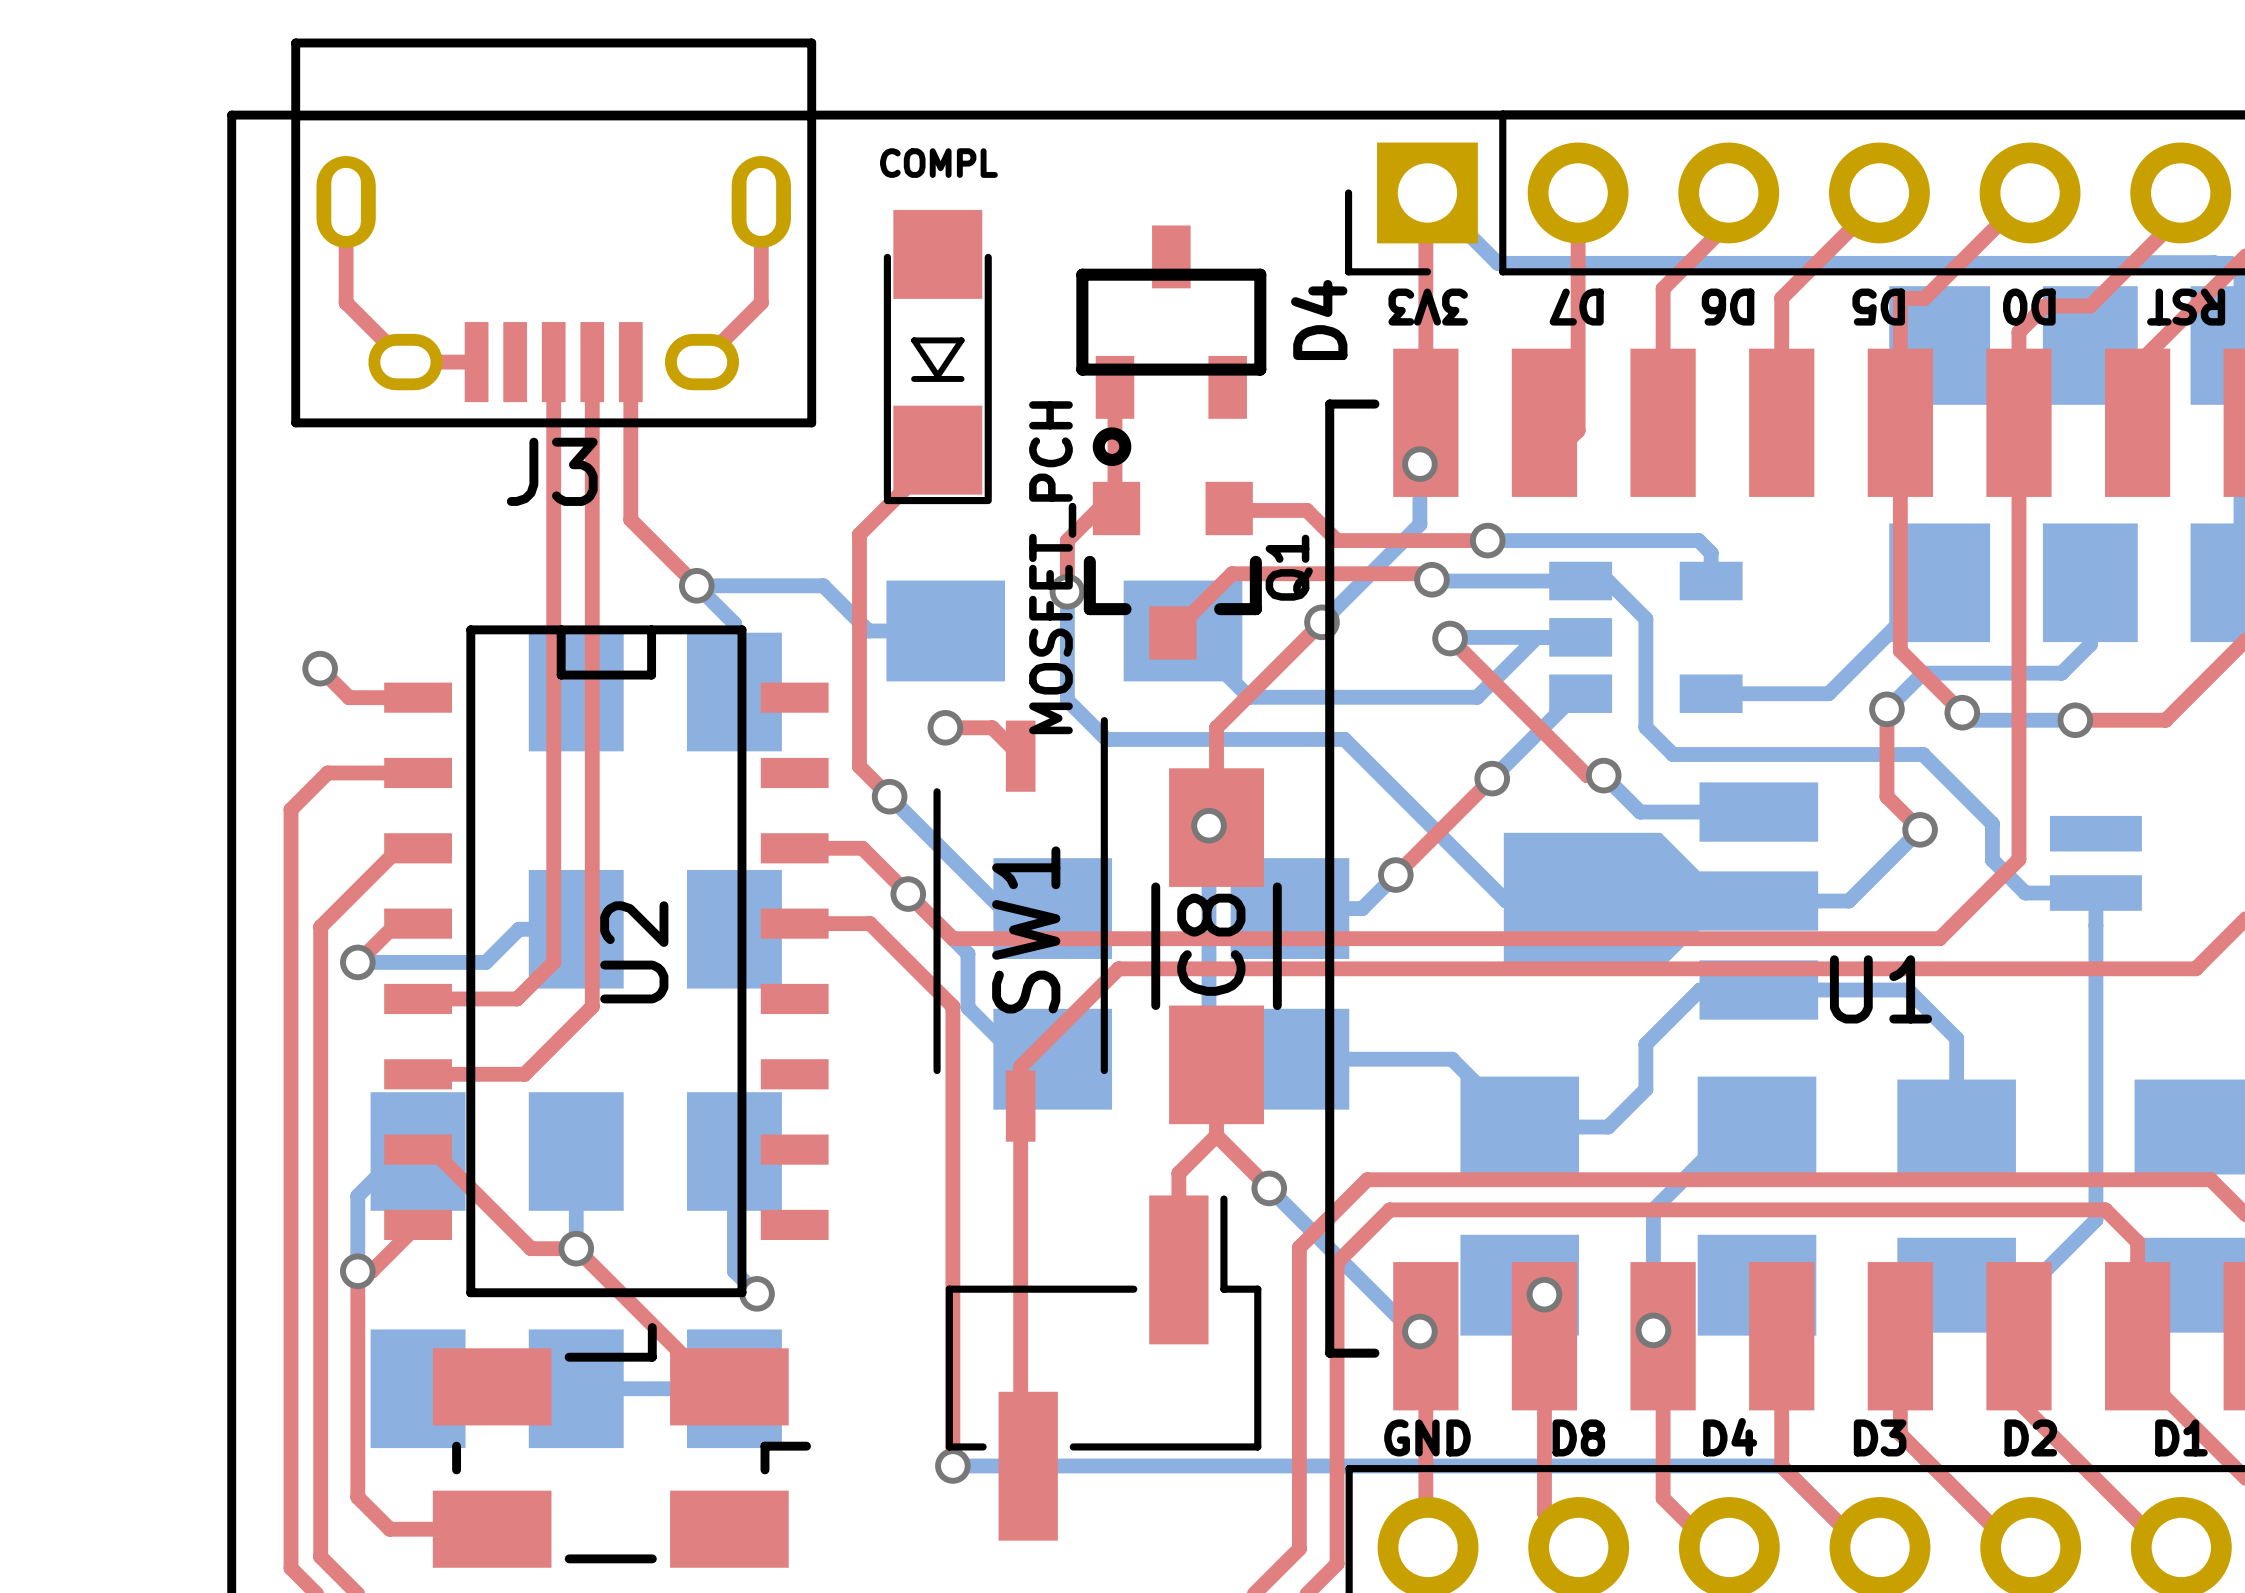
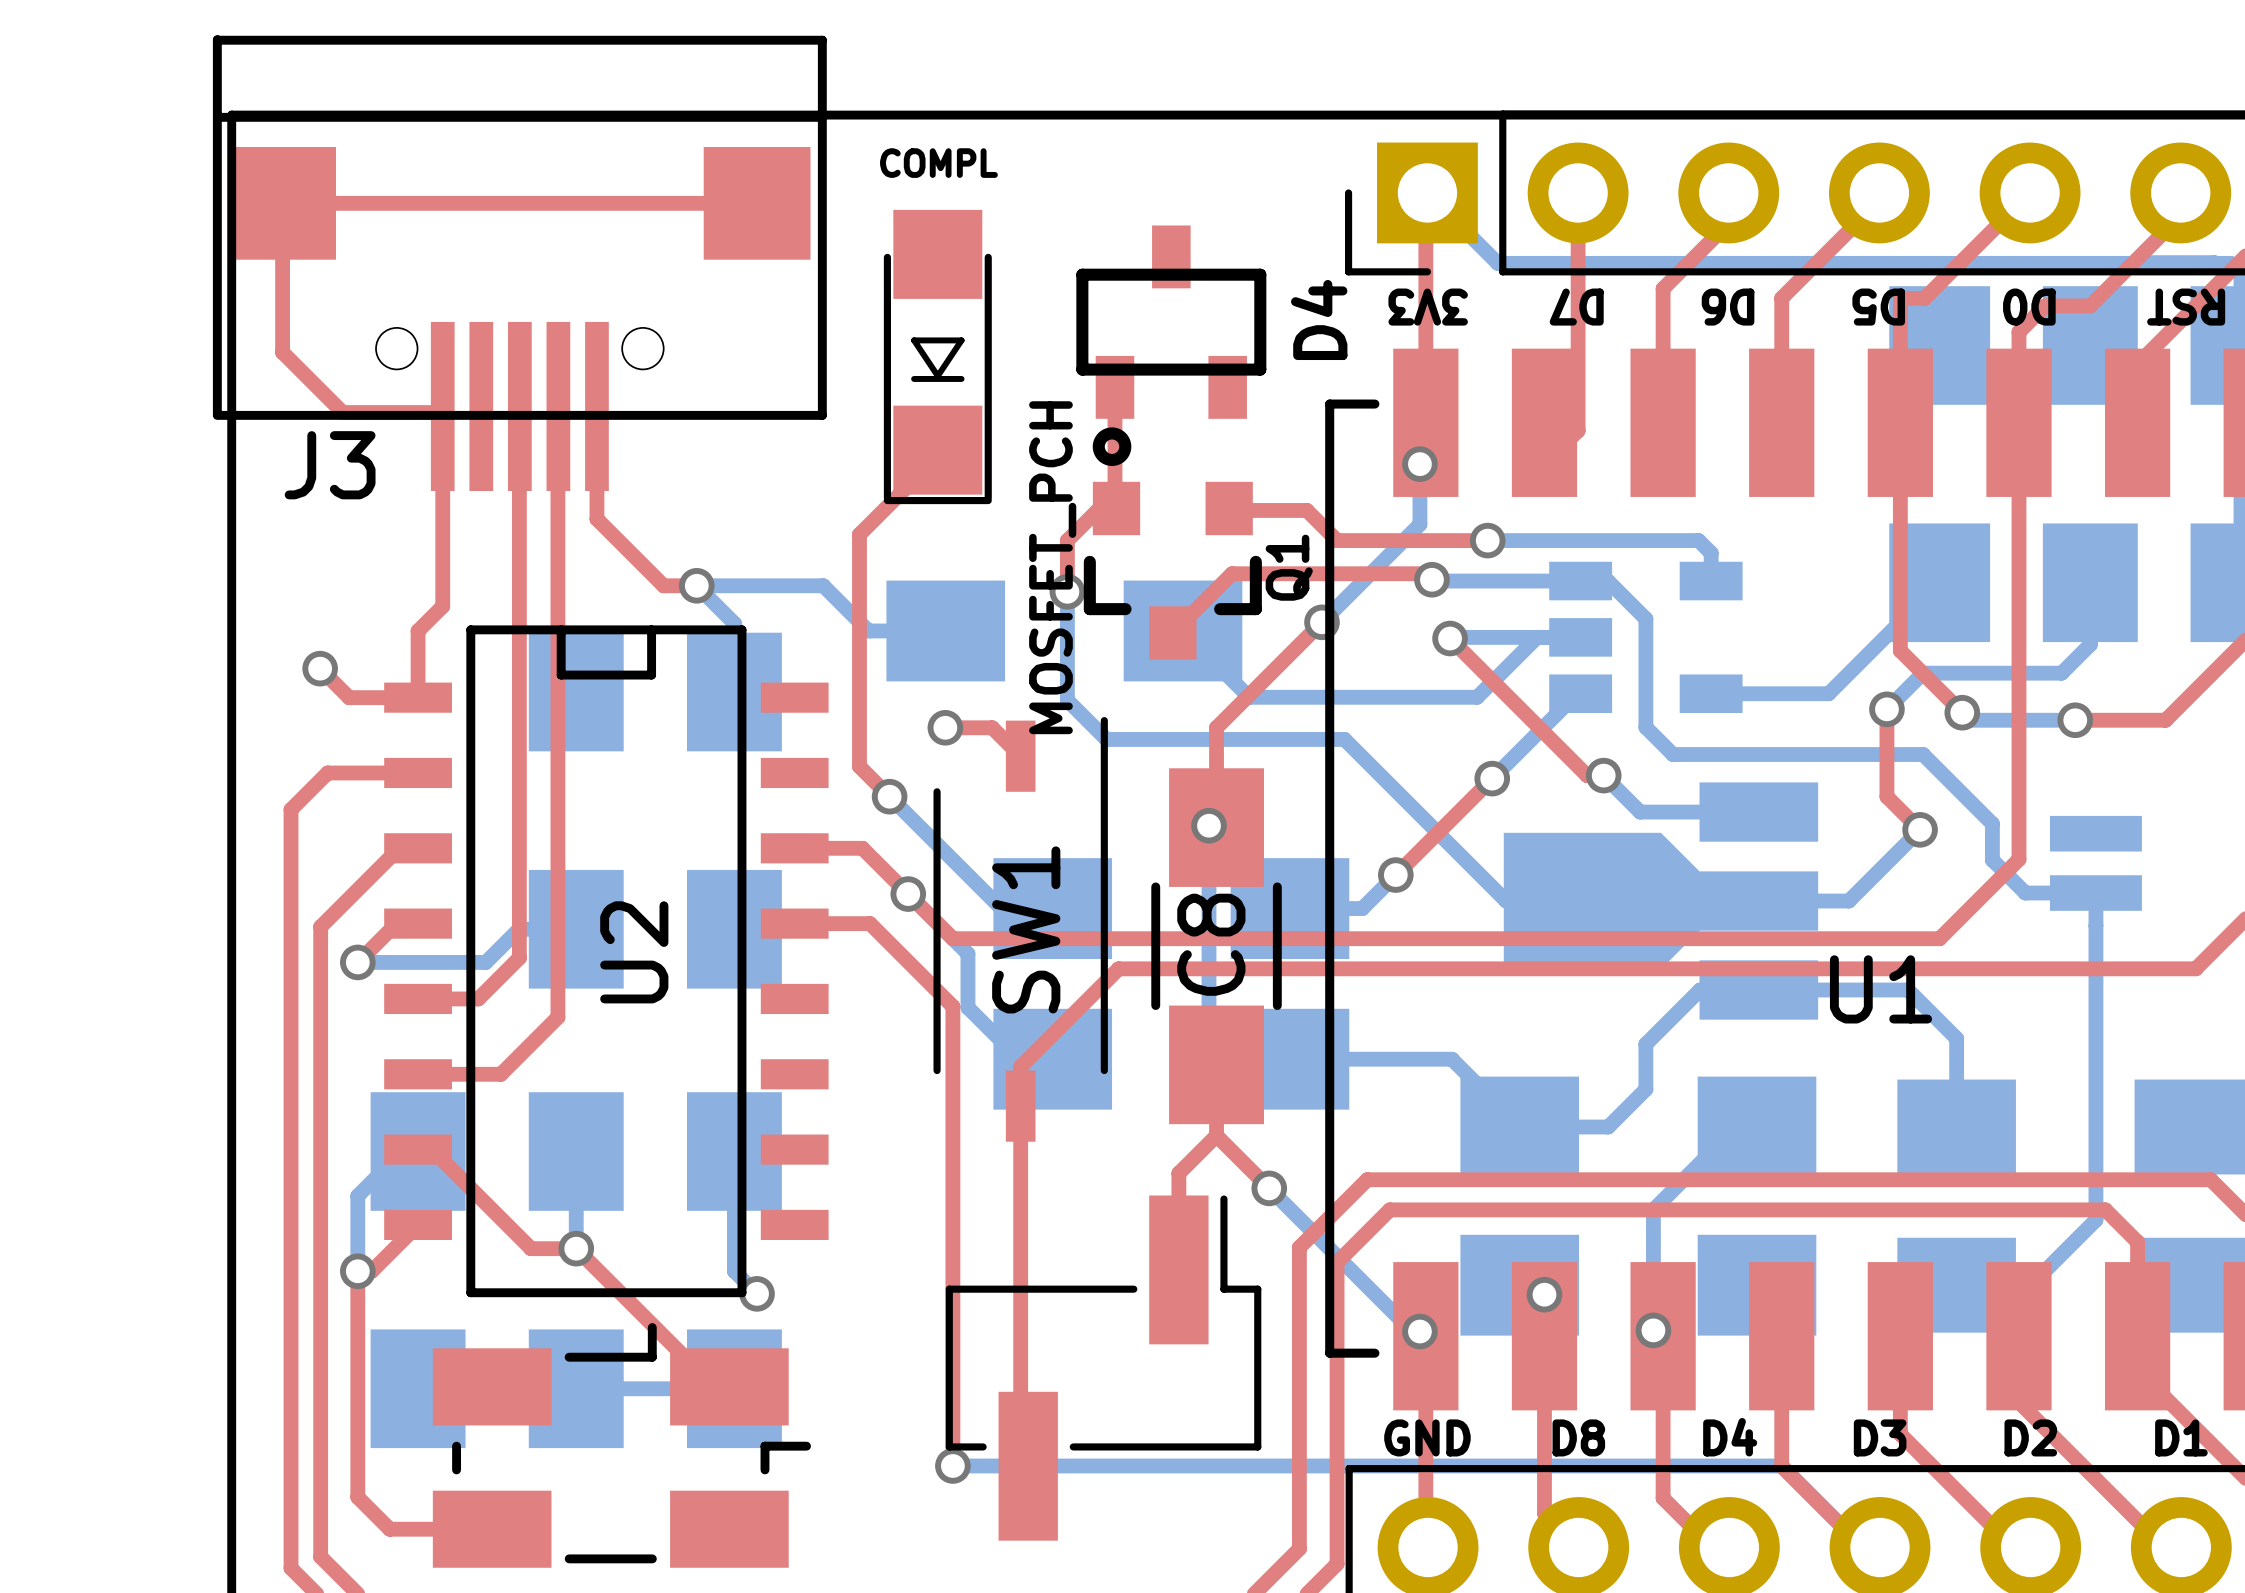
J3 footprint: [291, 38, 817, 428] -> [212, 35, 827, 492]
top track: (346, 201) (346, 302) (405, 362) (476, 362) -> none
top track: (761, 201) (761, 302) (701, 362) -> none
top track: none -> (757, 203) (282, 203) (282, 352) (342, 412) (436, 412) (442, 406) (442, 606) (418, 630) (418, 697)
top track: (553, 362) (553, 962) (517, 998) (478, 998) -> (519, 358) (519, 957) (478, 998)
top track: (592, 362) (592, 1006) (524, 1074) (500, 1074) -> (557, 358) (557, 1017) (500, 1074)
top track: (630, 362) (630, 519) (696, 585) -> (596, 406) (596, 519) (663, 585) (696, 585)
J3 name position: J3 (552, 471) -> J3 (330, 465)

